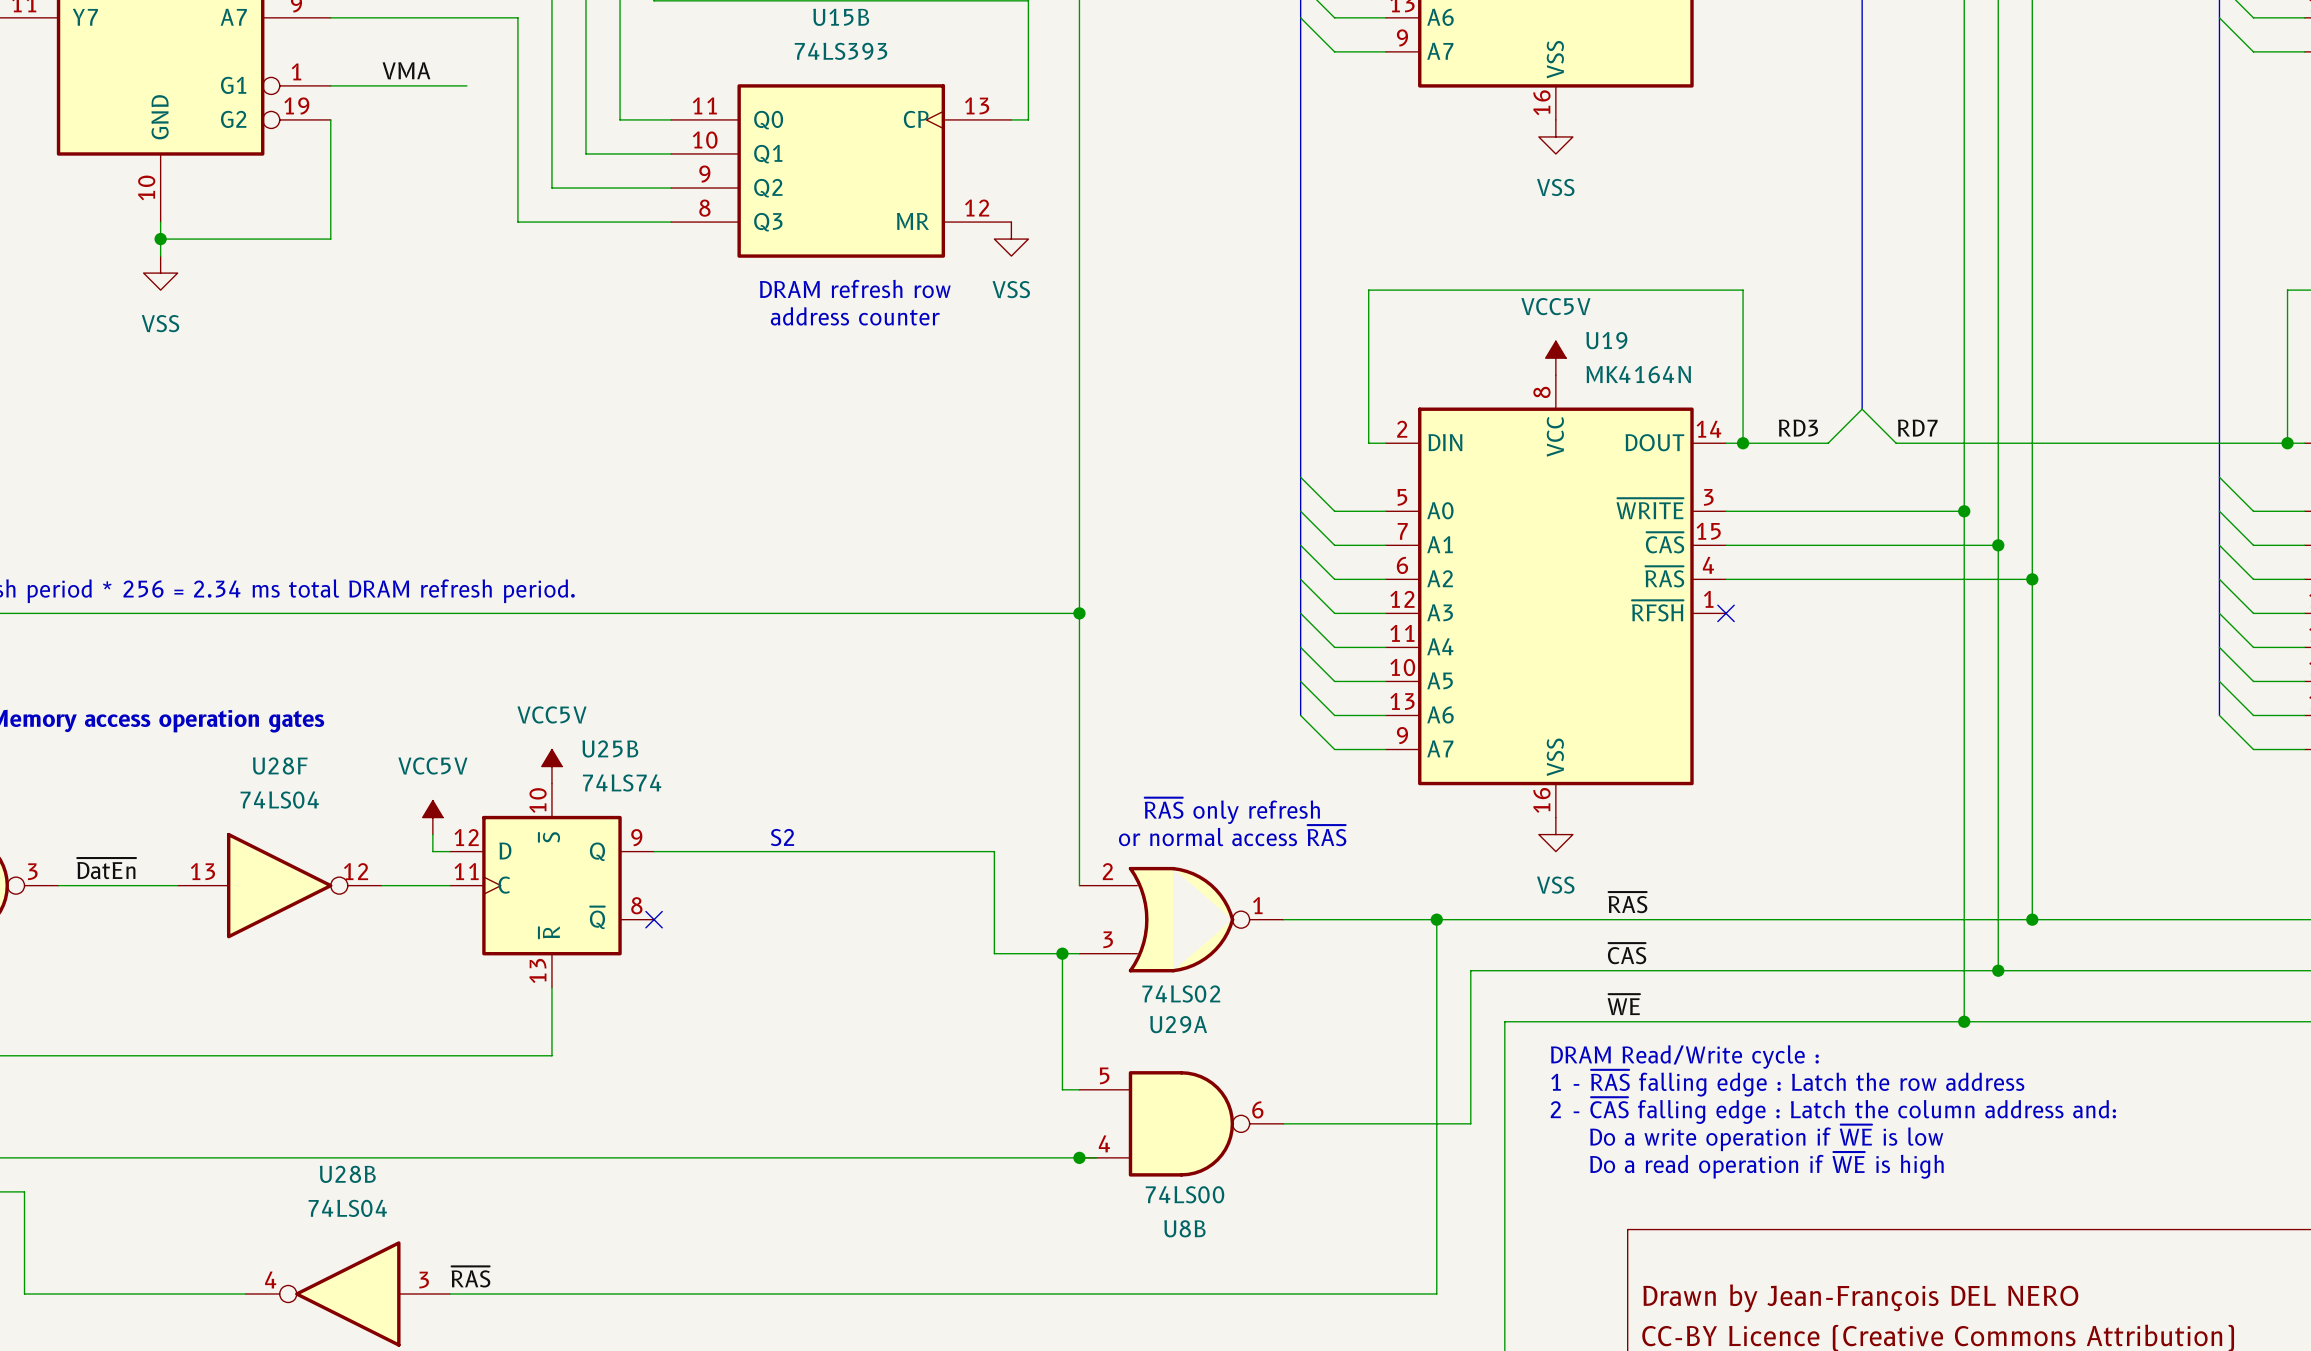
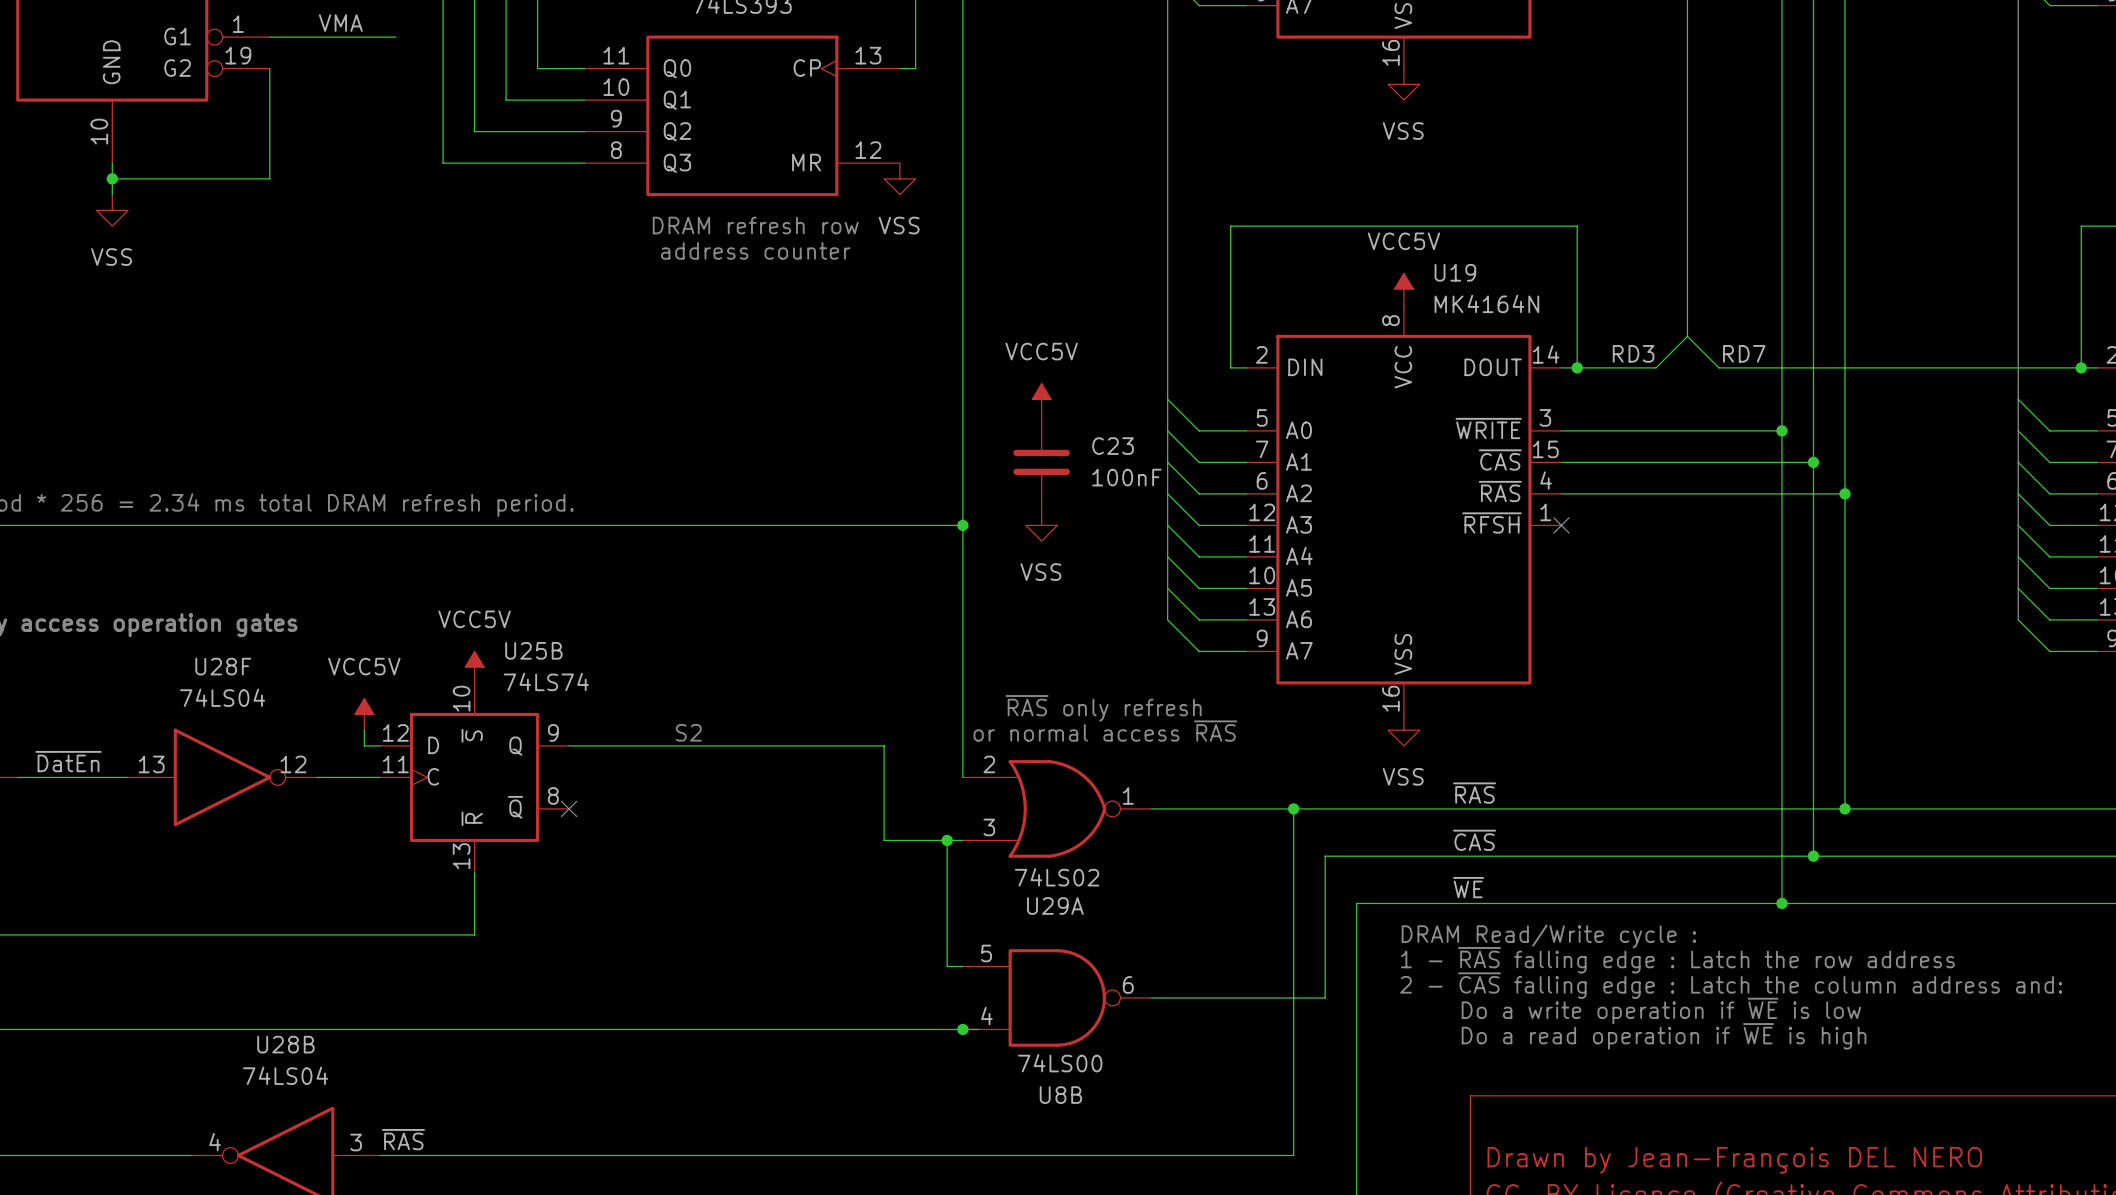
power symbol: none -> VCC5V (1041, 399)
C23: none -> 100nF (1041, 462)
power symbol: none -> VSS (1041, 525)

